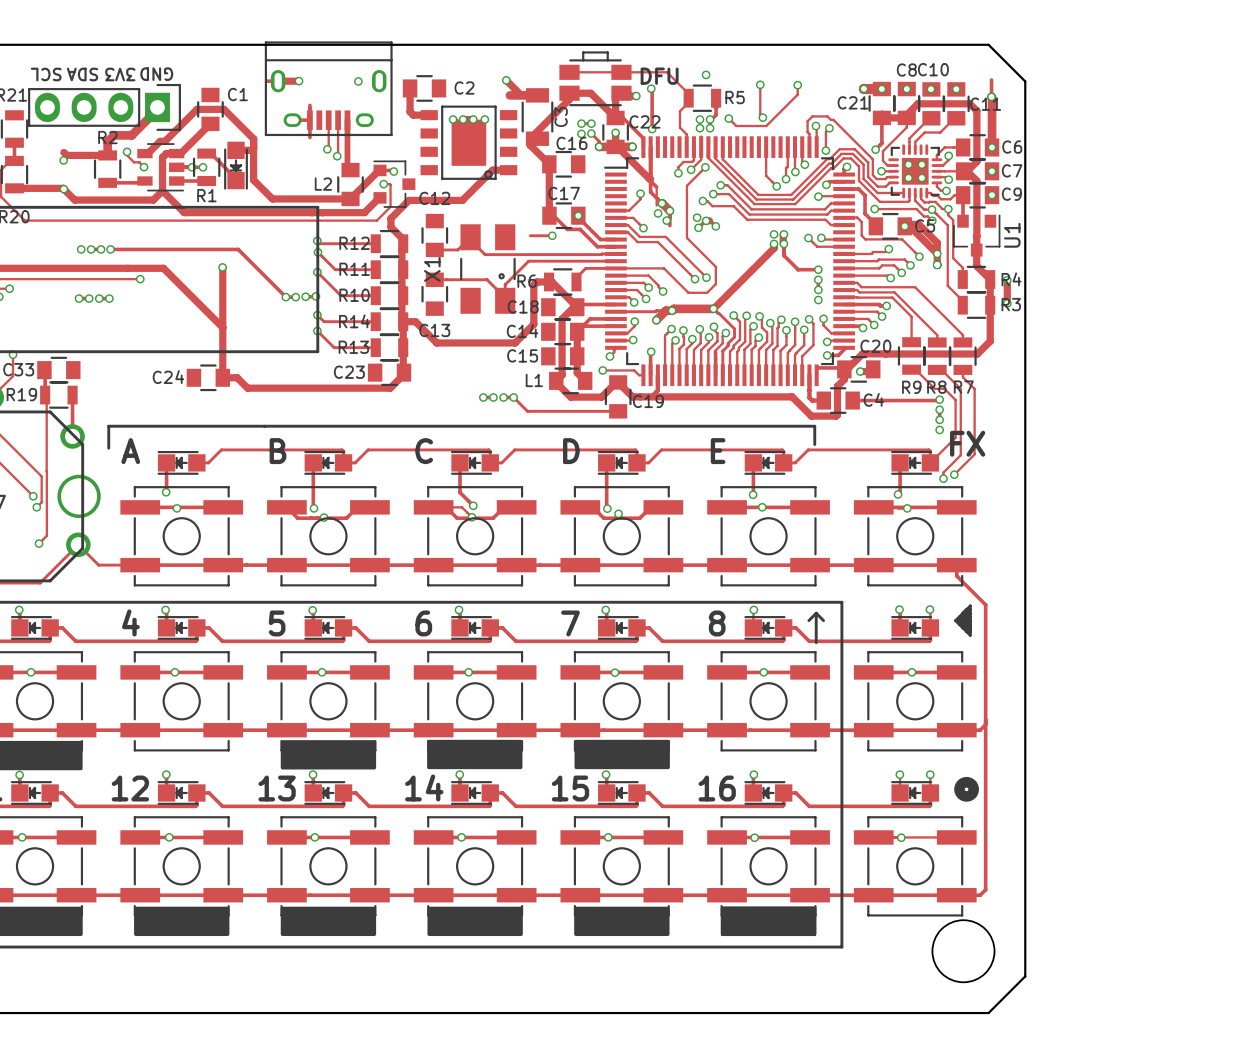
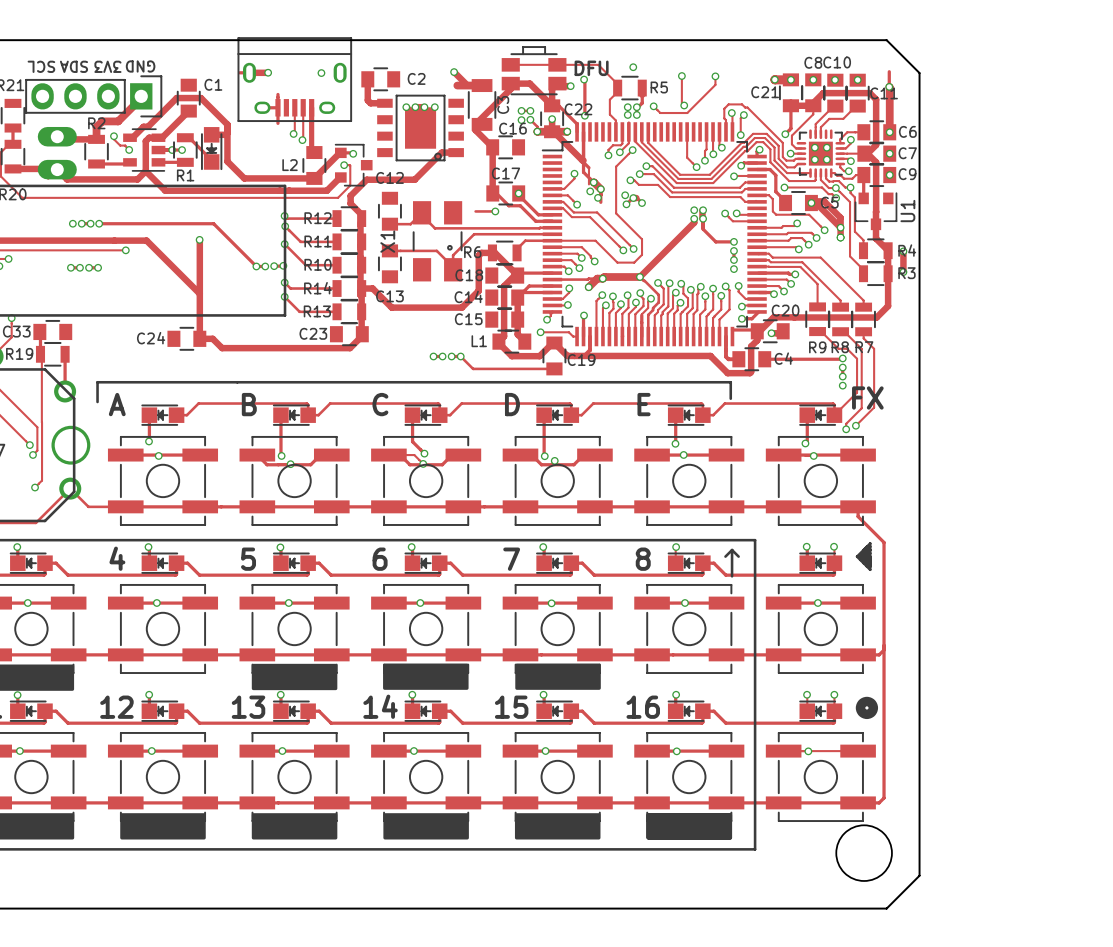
via: (63, 160) -> none
part: none -> (57, 153)
via: (63, 189) -> none

